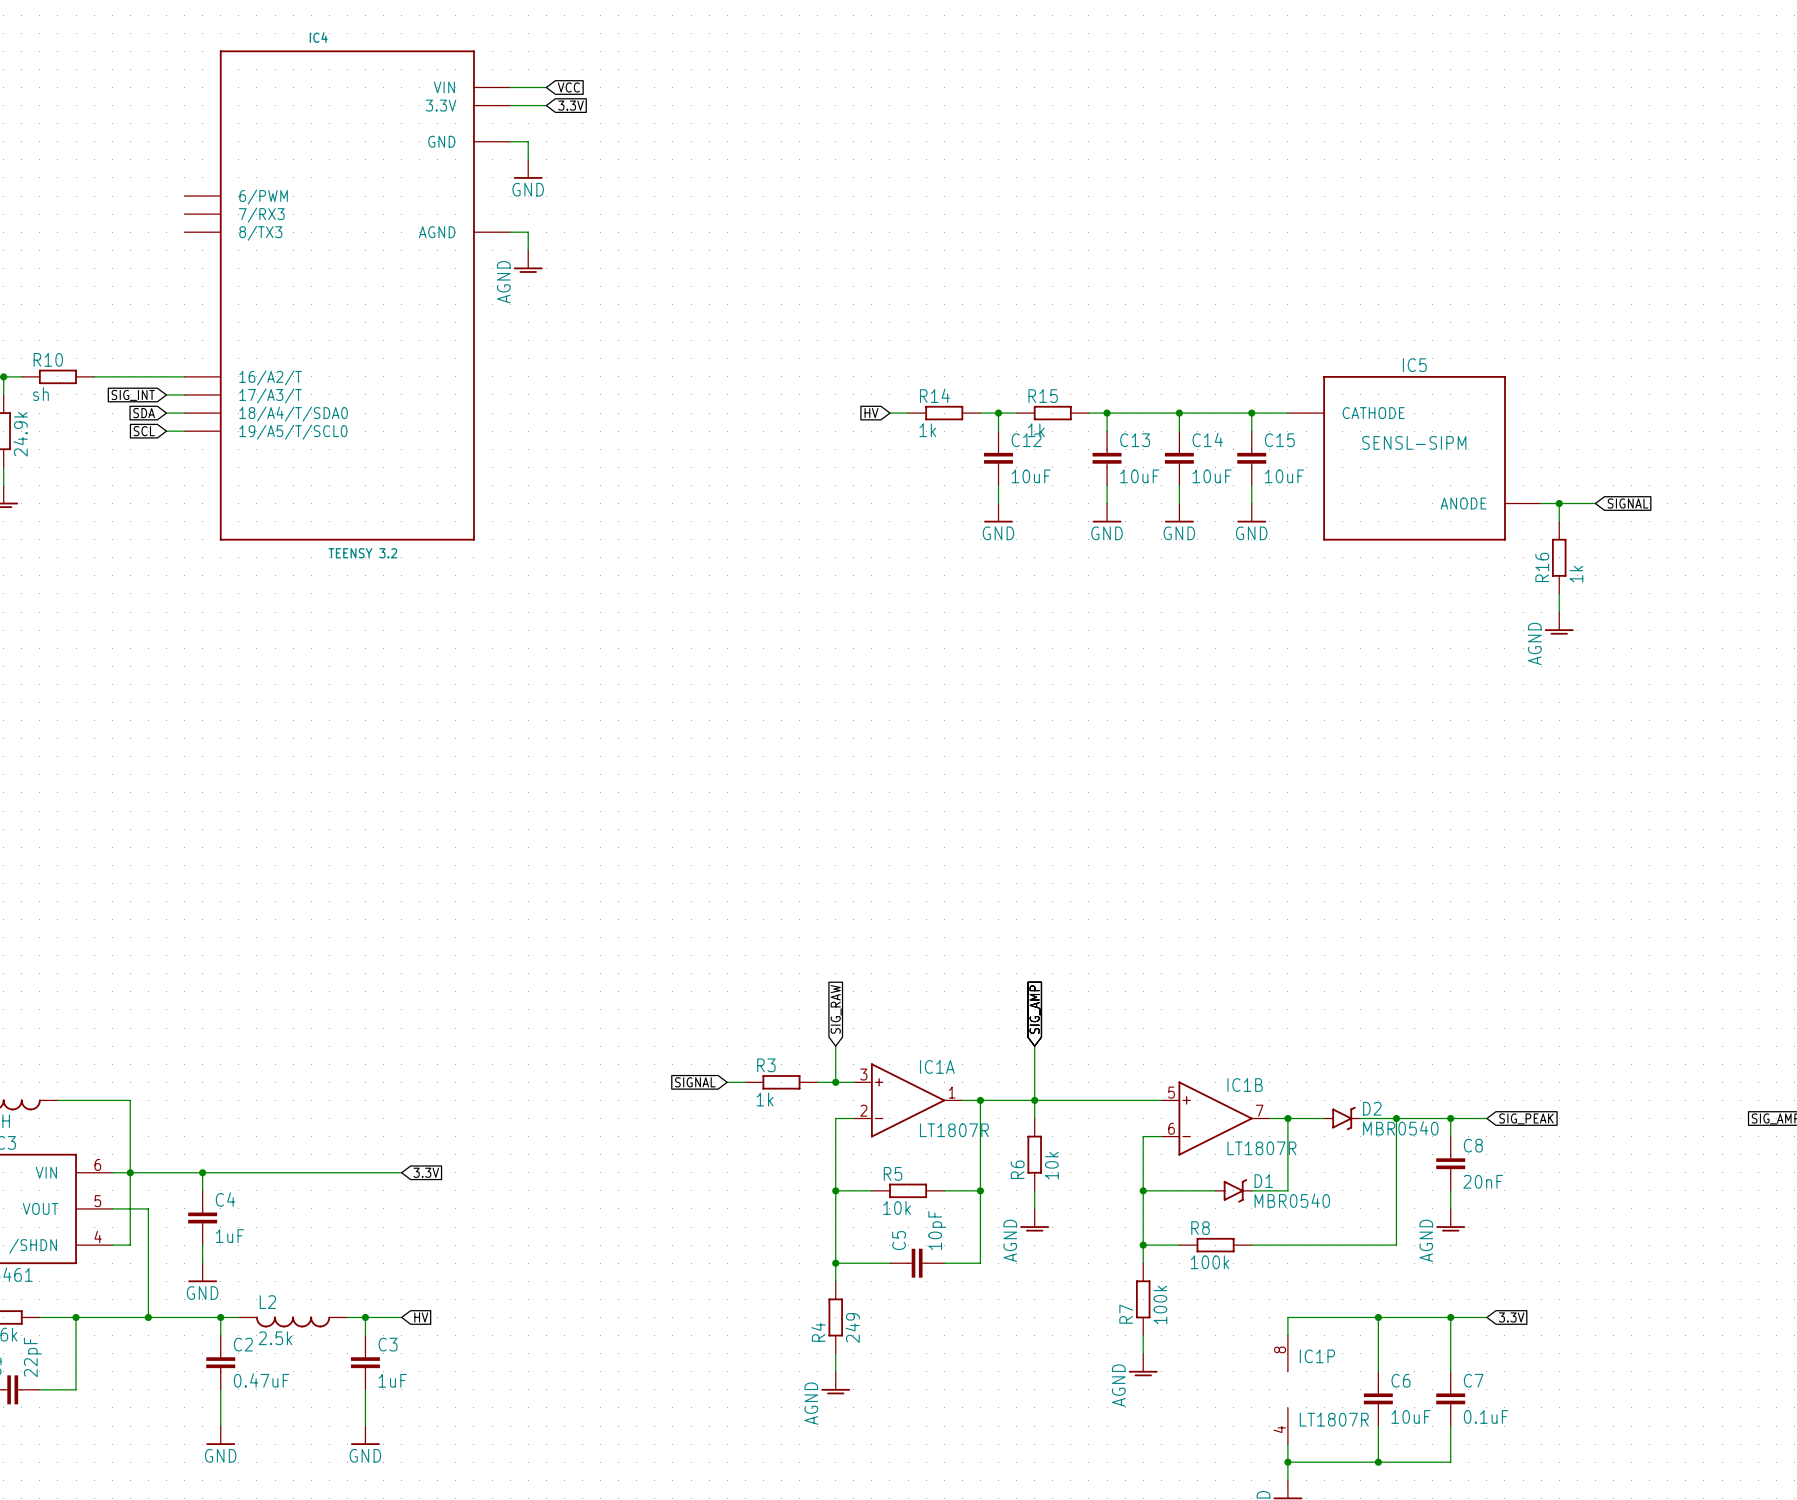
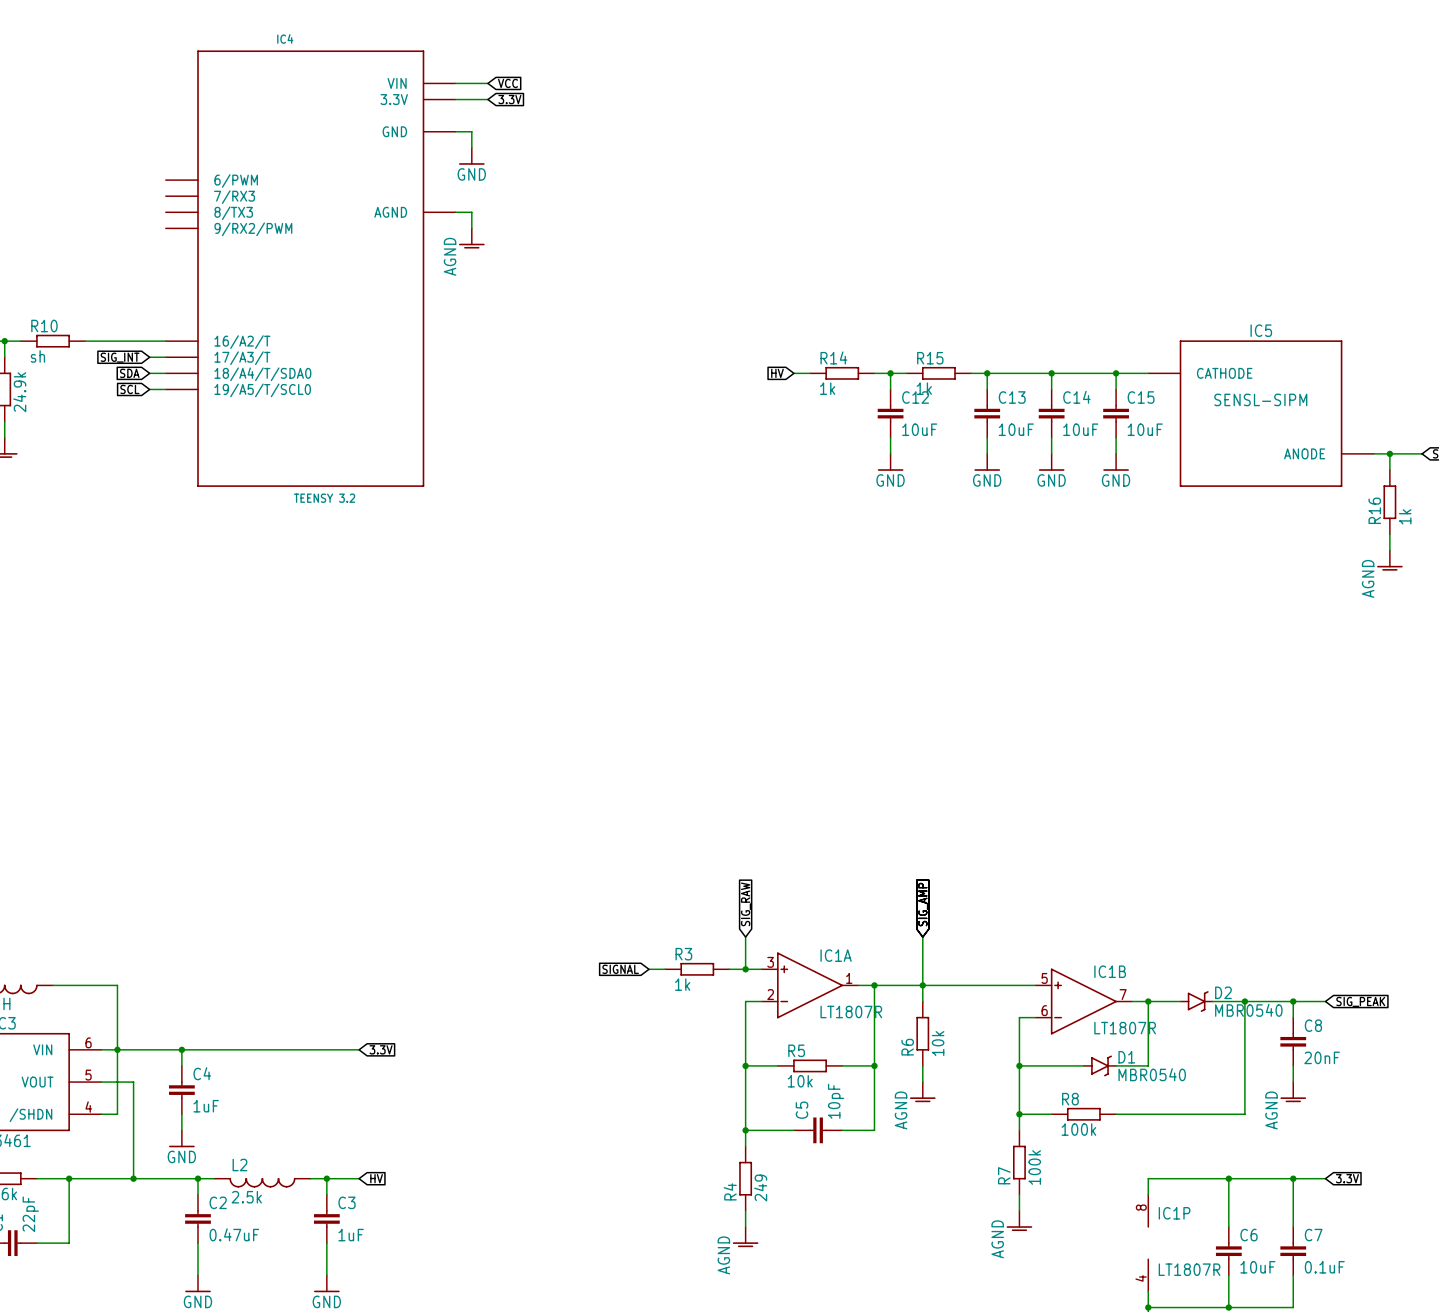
IC4 symbol: [184, 50, 511, 541] -> [165, 50, 456, 487]

